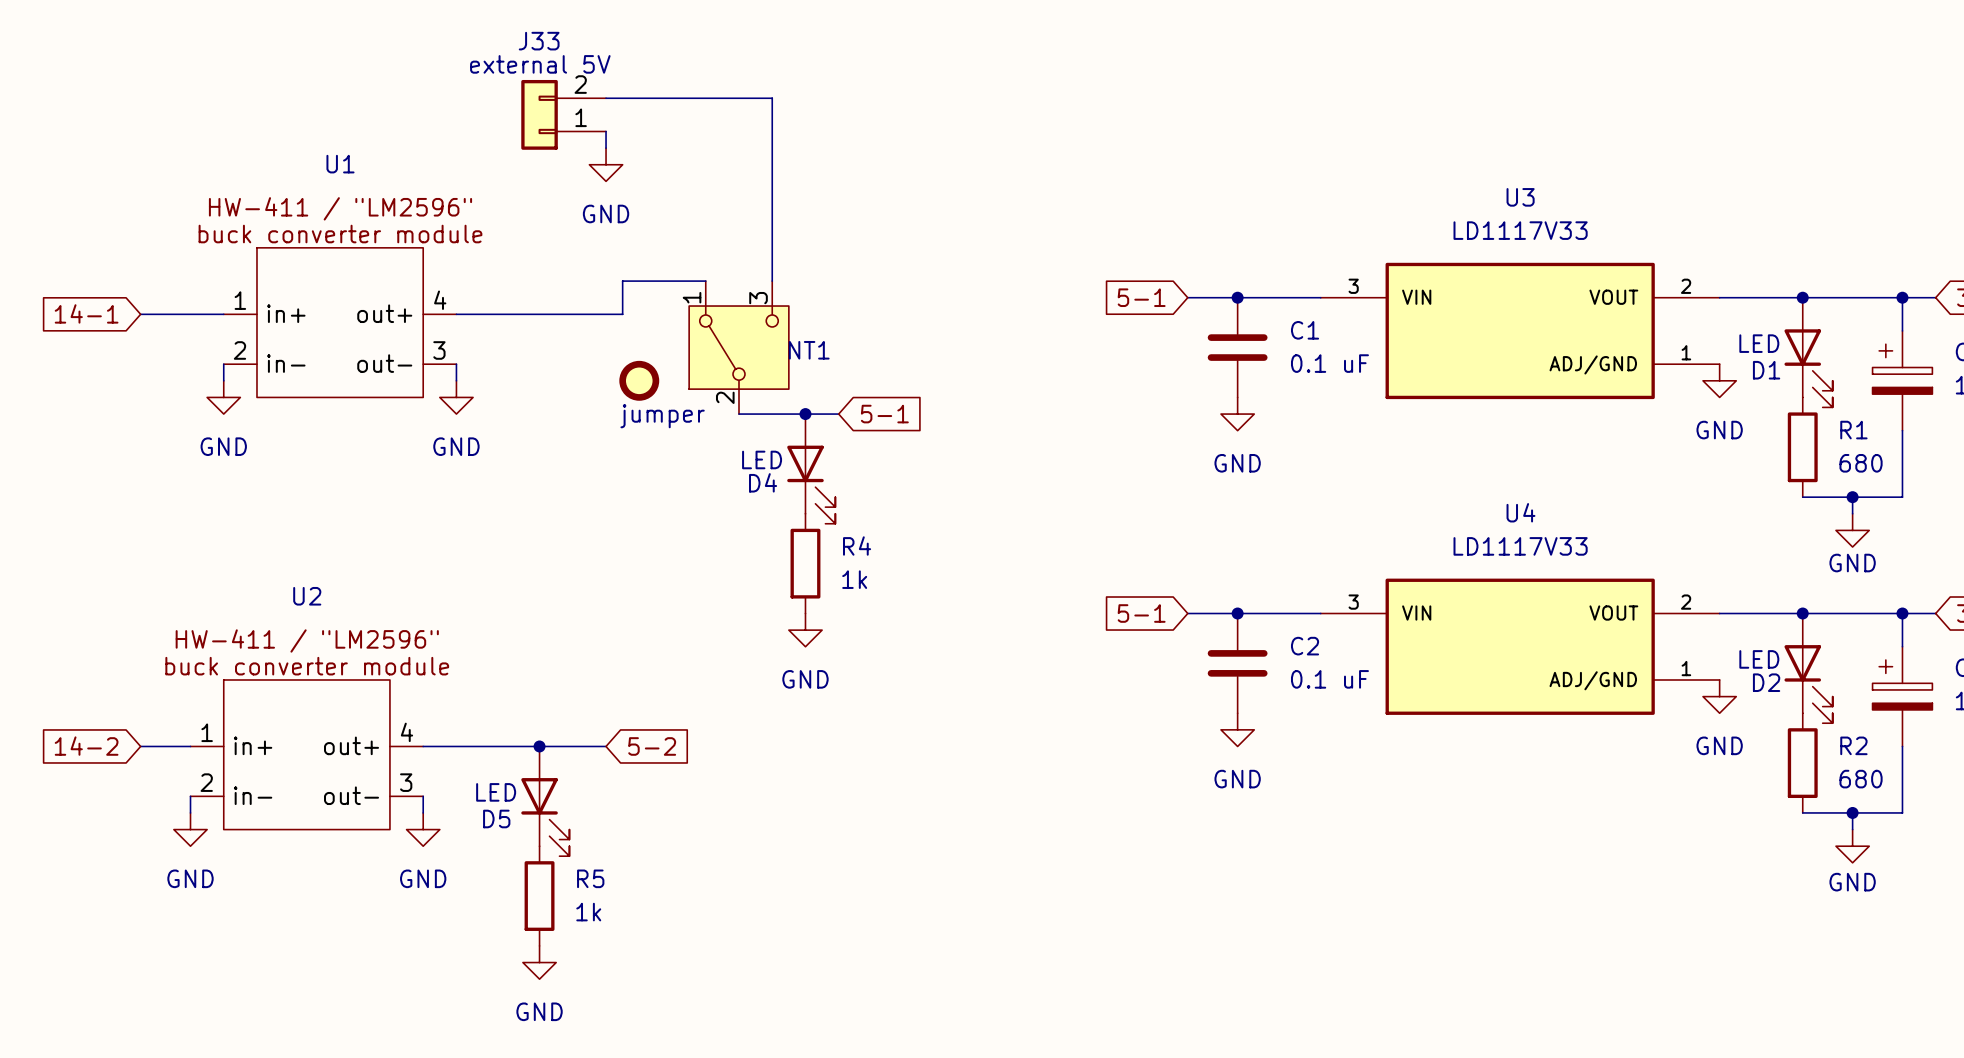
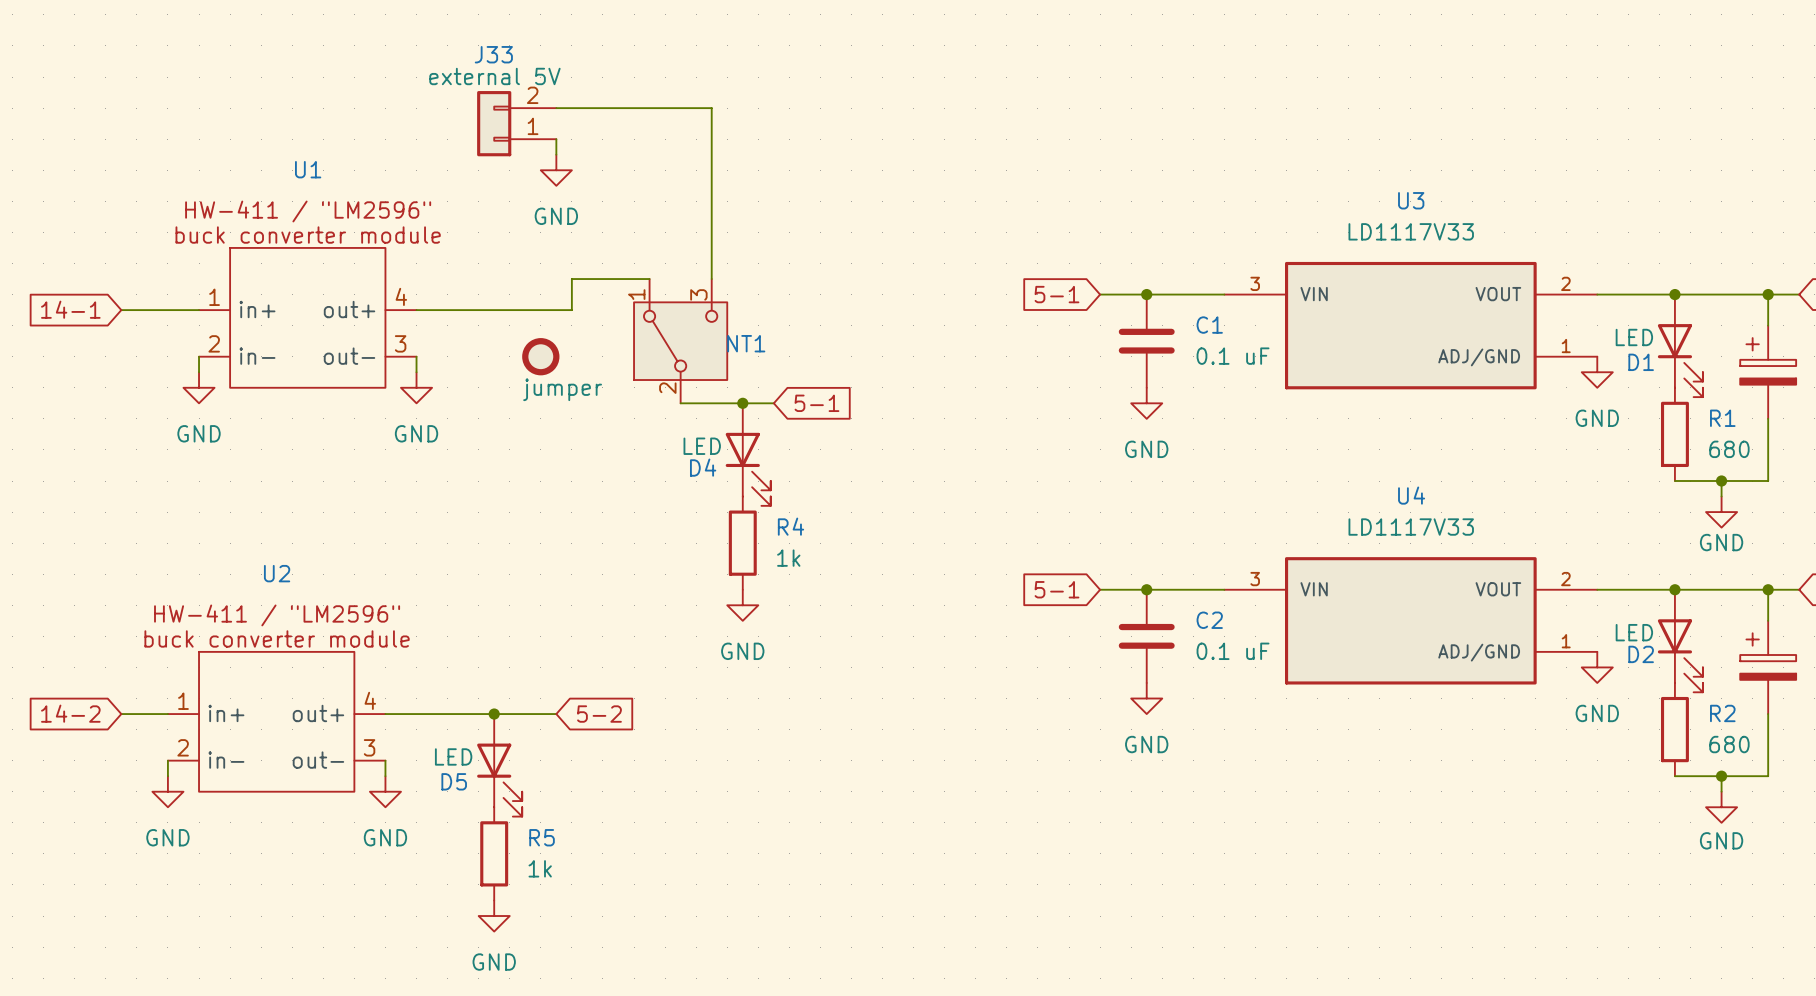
part position: (639, 380) -> (540, 356)

